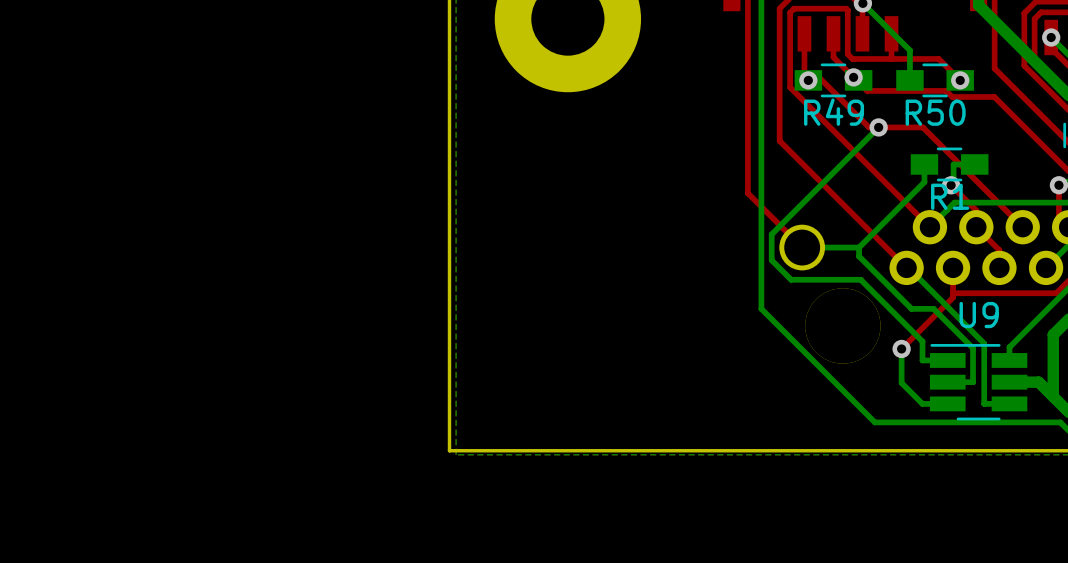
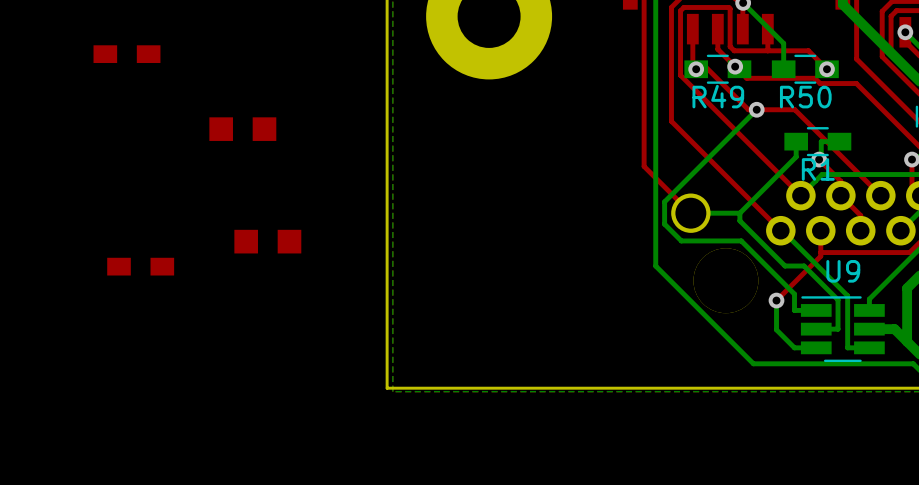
part: none -> (126, 54)
part: none -> (242, 129)
part: none -> (267, 241)
part: none -> (140, 266)

